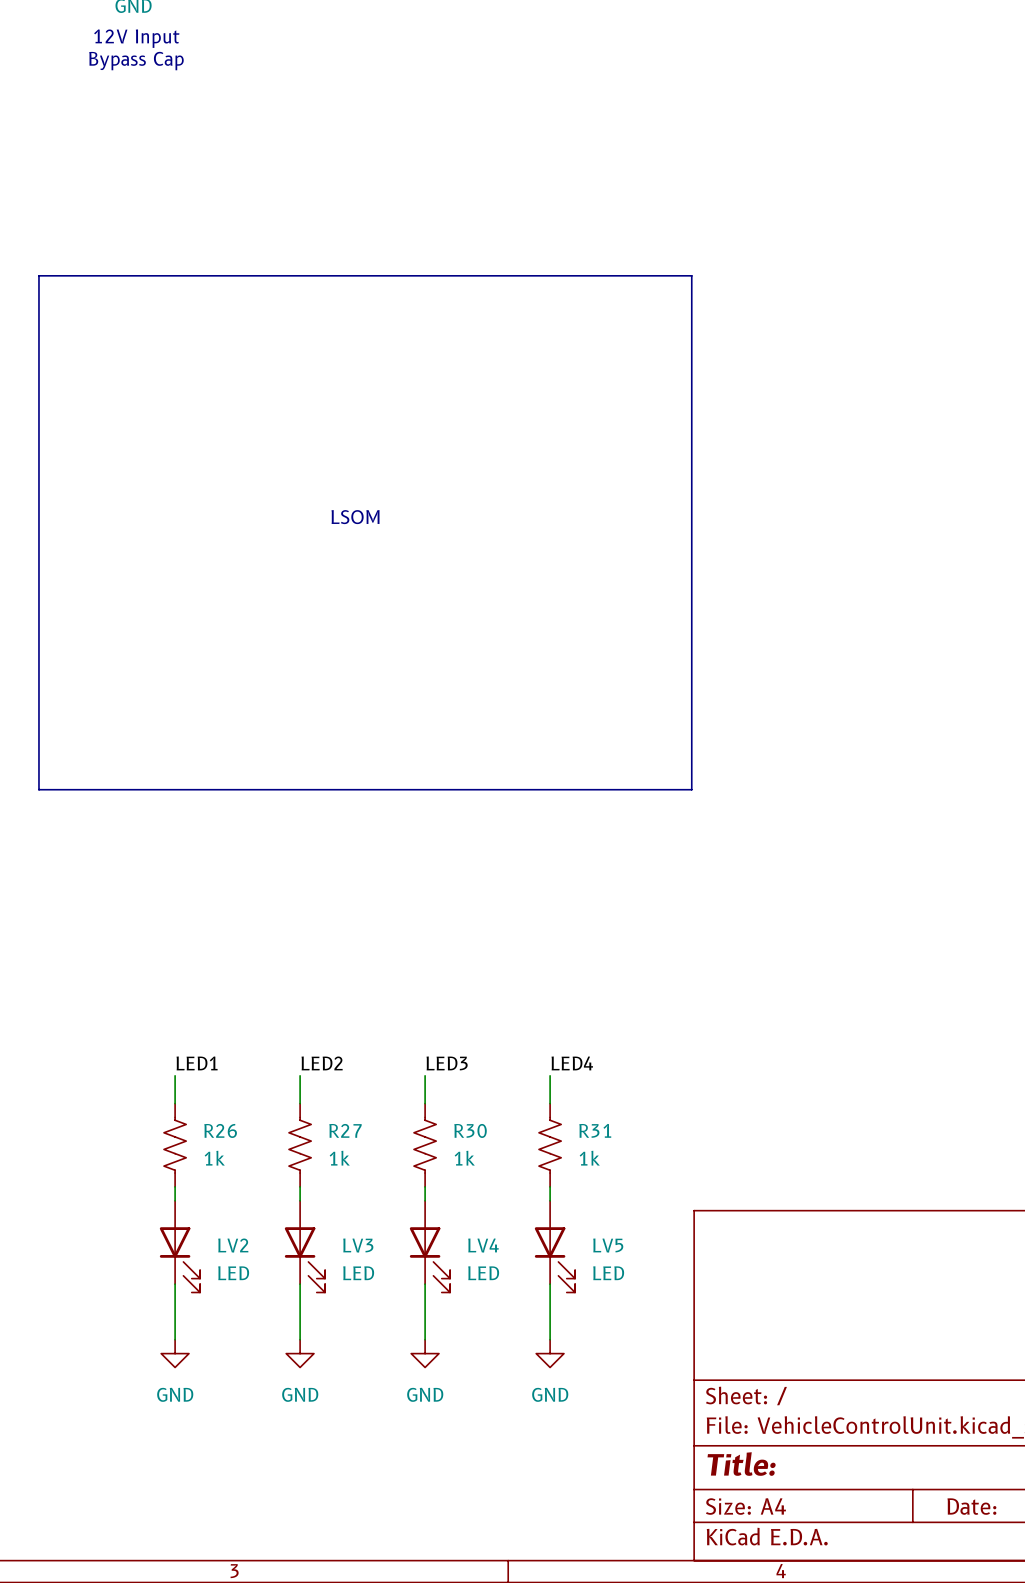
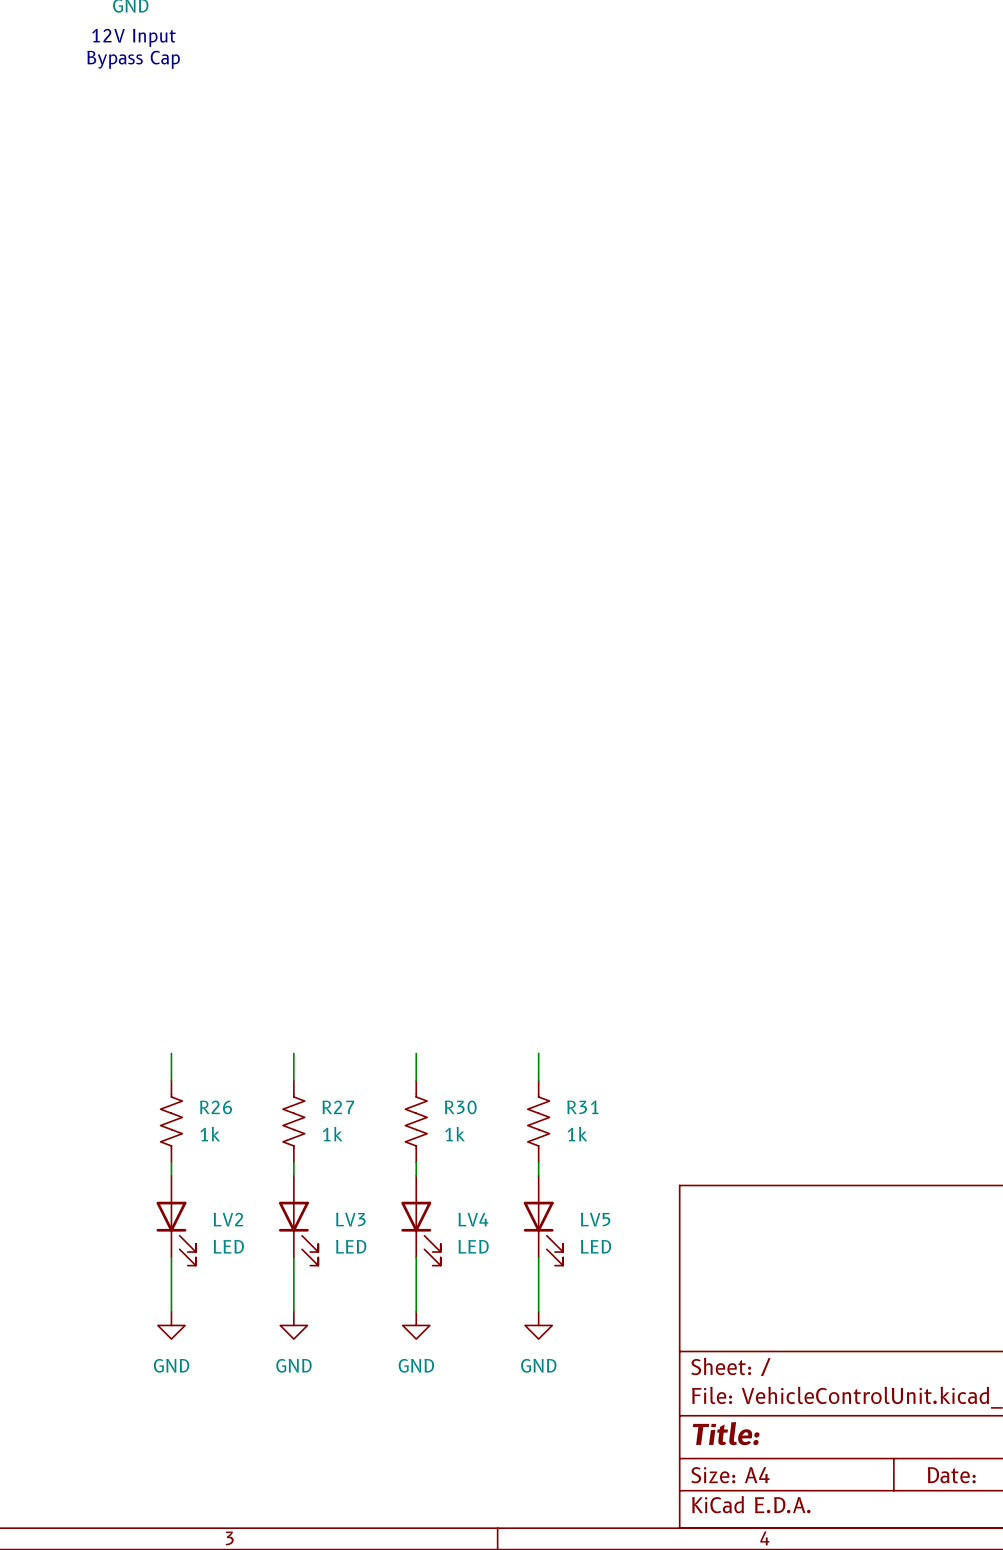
line: (38, 275) (691, 275) (691, 789) (38, 789) (38, 275) -> none
text: LSOM (355, 517) -> none
label: LED1 (197, 1063) -> none
label: LED2 (322, 1063) -> none
label: LED3 (447, 1063) -> none
label: LED4 (572, 1063) -> none

